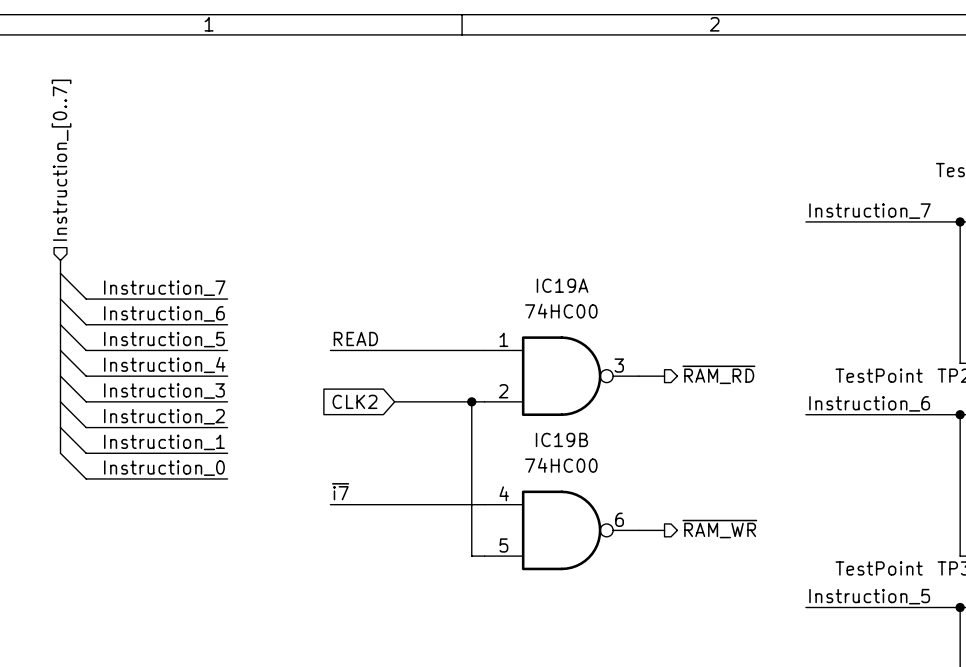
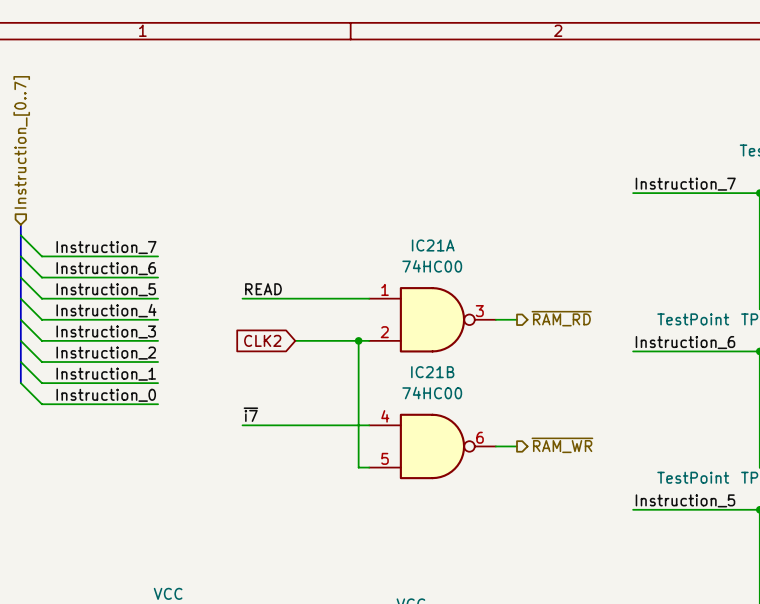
IC19A name: IC19A (562, 285) -> IC21A (433, 245)
IC19B name: IC19B (561, 439) -> IC21B (432, 372)

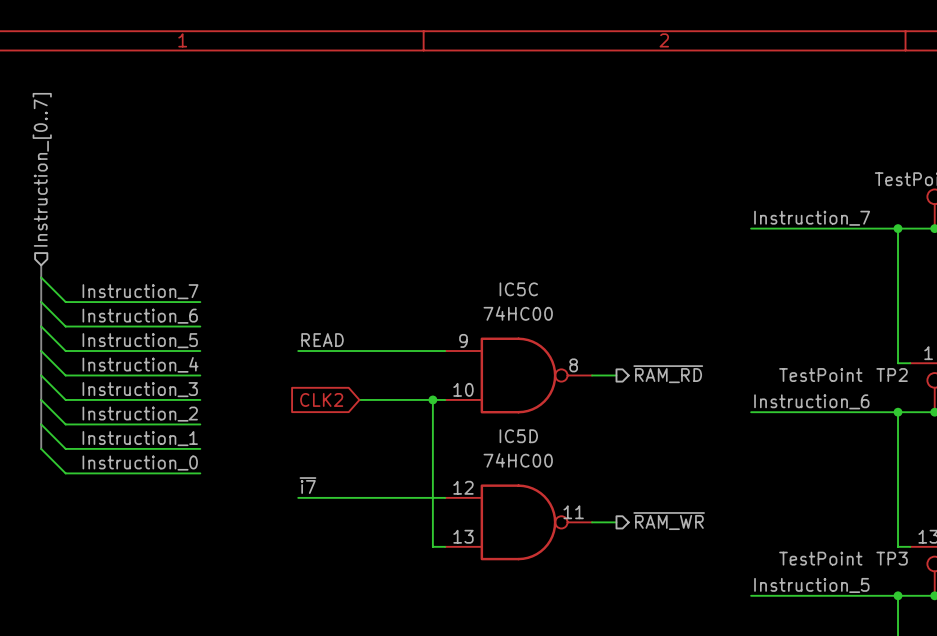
IC21A name: IC21A (433, 245) -> IC5C (518, 289)
IC21A pin number: 1 (385, 289) -> 9 (463, 340)
IC21A pin number: 3 (479, 311) -> 8 (573, 365)
IC21A pin number: 2 (384, 332) -> 10 (463, 389)
IC21B name: IC21B (432, 372) -> IC5D (518, 436)
IC21B pin number: 4 (385, 416) -> 12 (463, 487)
IC21B pin number: 6 (480, 437) -> 11 (573, 512)
IC21B pin number: 5 (385, 458) -> 13 (463, 536)

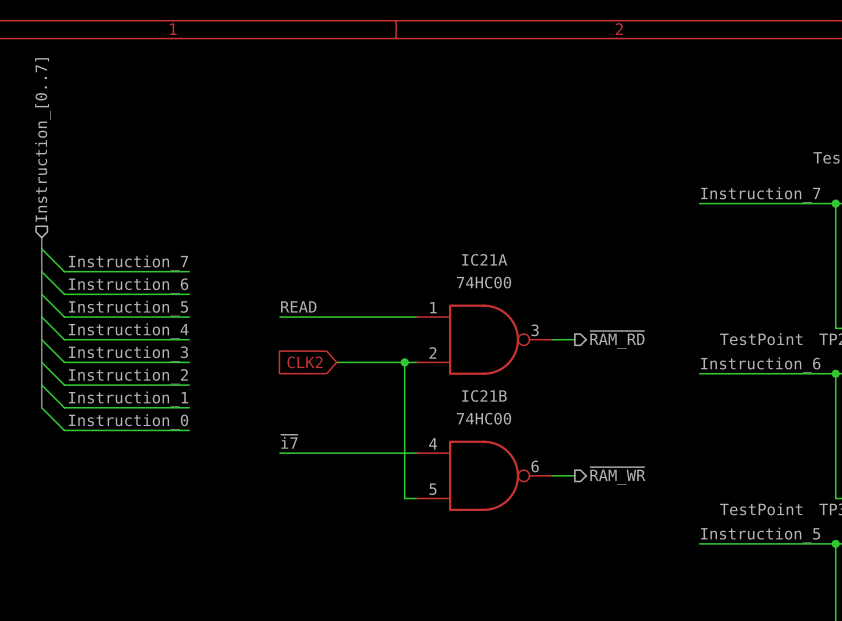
IC5C name: IC5C (518, 289) -> IC21A (484, 259)
IC5C pin number: 9 (463, 340) -> 1 (433, 307)
IC5C pin number: 8 (573, 365) -> 3 (535, 330)
IC5C pin number: 10 (463, 389) -> 2 (432, 352)
IC5D name: IC5D (518, 436) -> IC21B (484, 396)
IC5D pin number: 12 (463, 487) -> 4 (433, 443)
IC5D pin number: 11 (573, 512) -> 6 (535, 466)
IC5D pin number: 13 (463, 536) -> 5 (432, 489)

